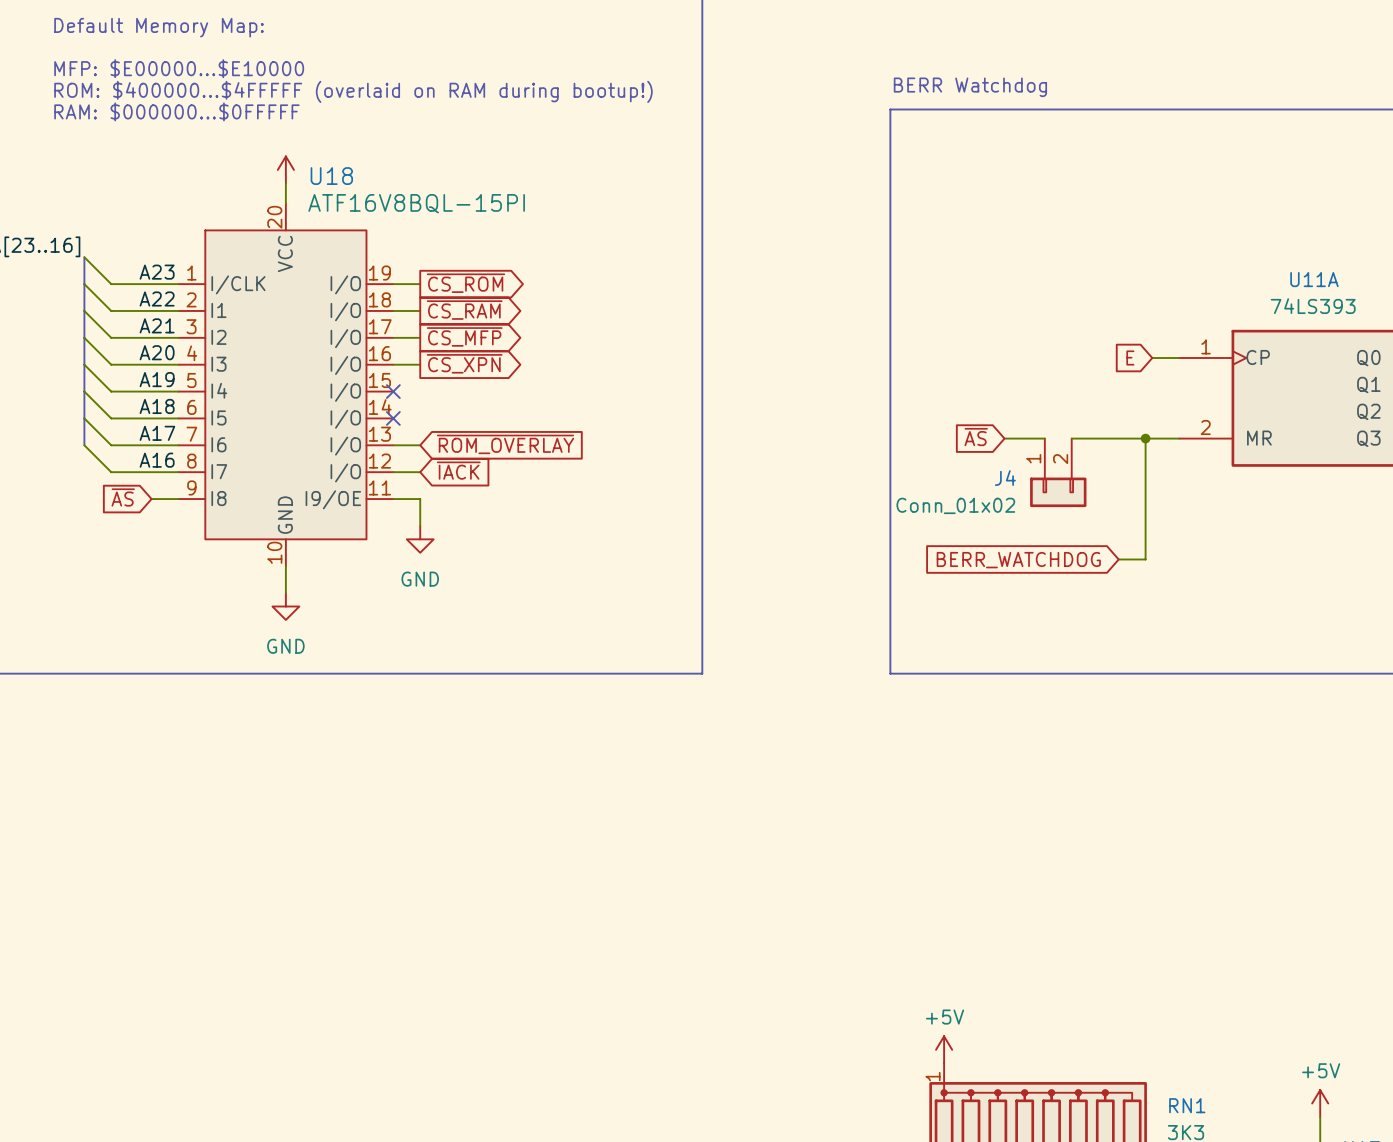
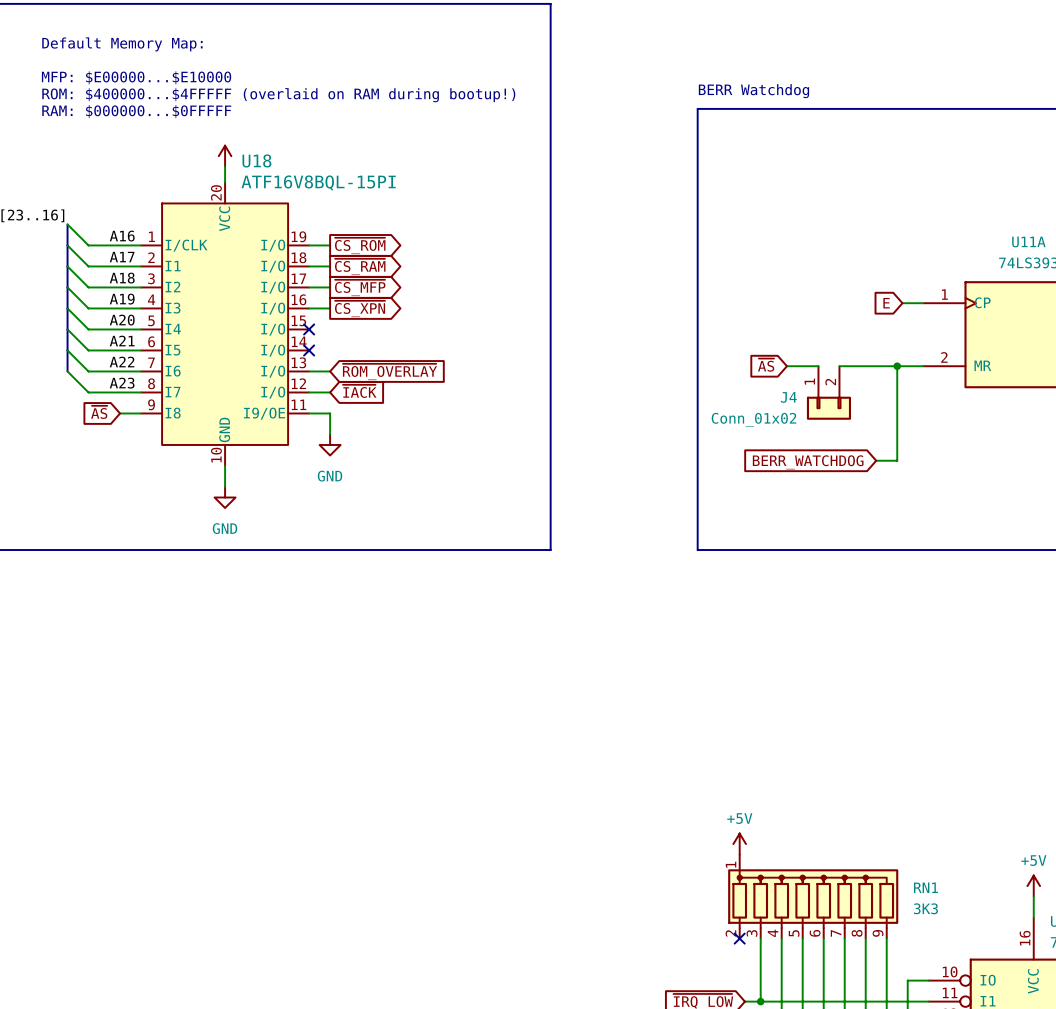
label: A23 (157, 272) -> A16 (122, 236)
label: A22 (157, 298) -> A17 (122, 257)
label: A21 (157, 325) -> A18 (122, 278)
label: A20 (157, 352) -> A19 (122, 299)
label: A19 (157, 379) -> A20 (122, 320)
label: A18 (157, 406) -> A21 (122, 341)
label: A17 (157, 433) -> A22 (122, 362)
label: A16 (157, 460) -> A23 (122, 383)

